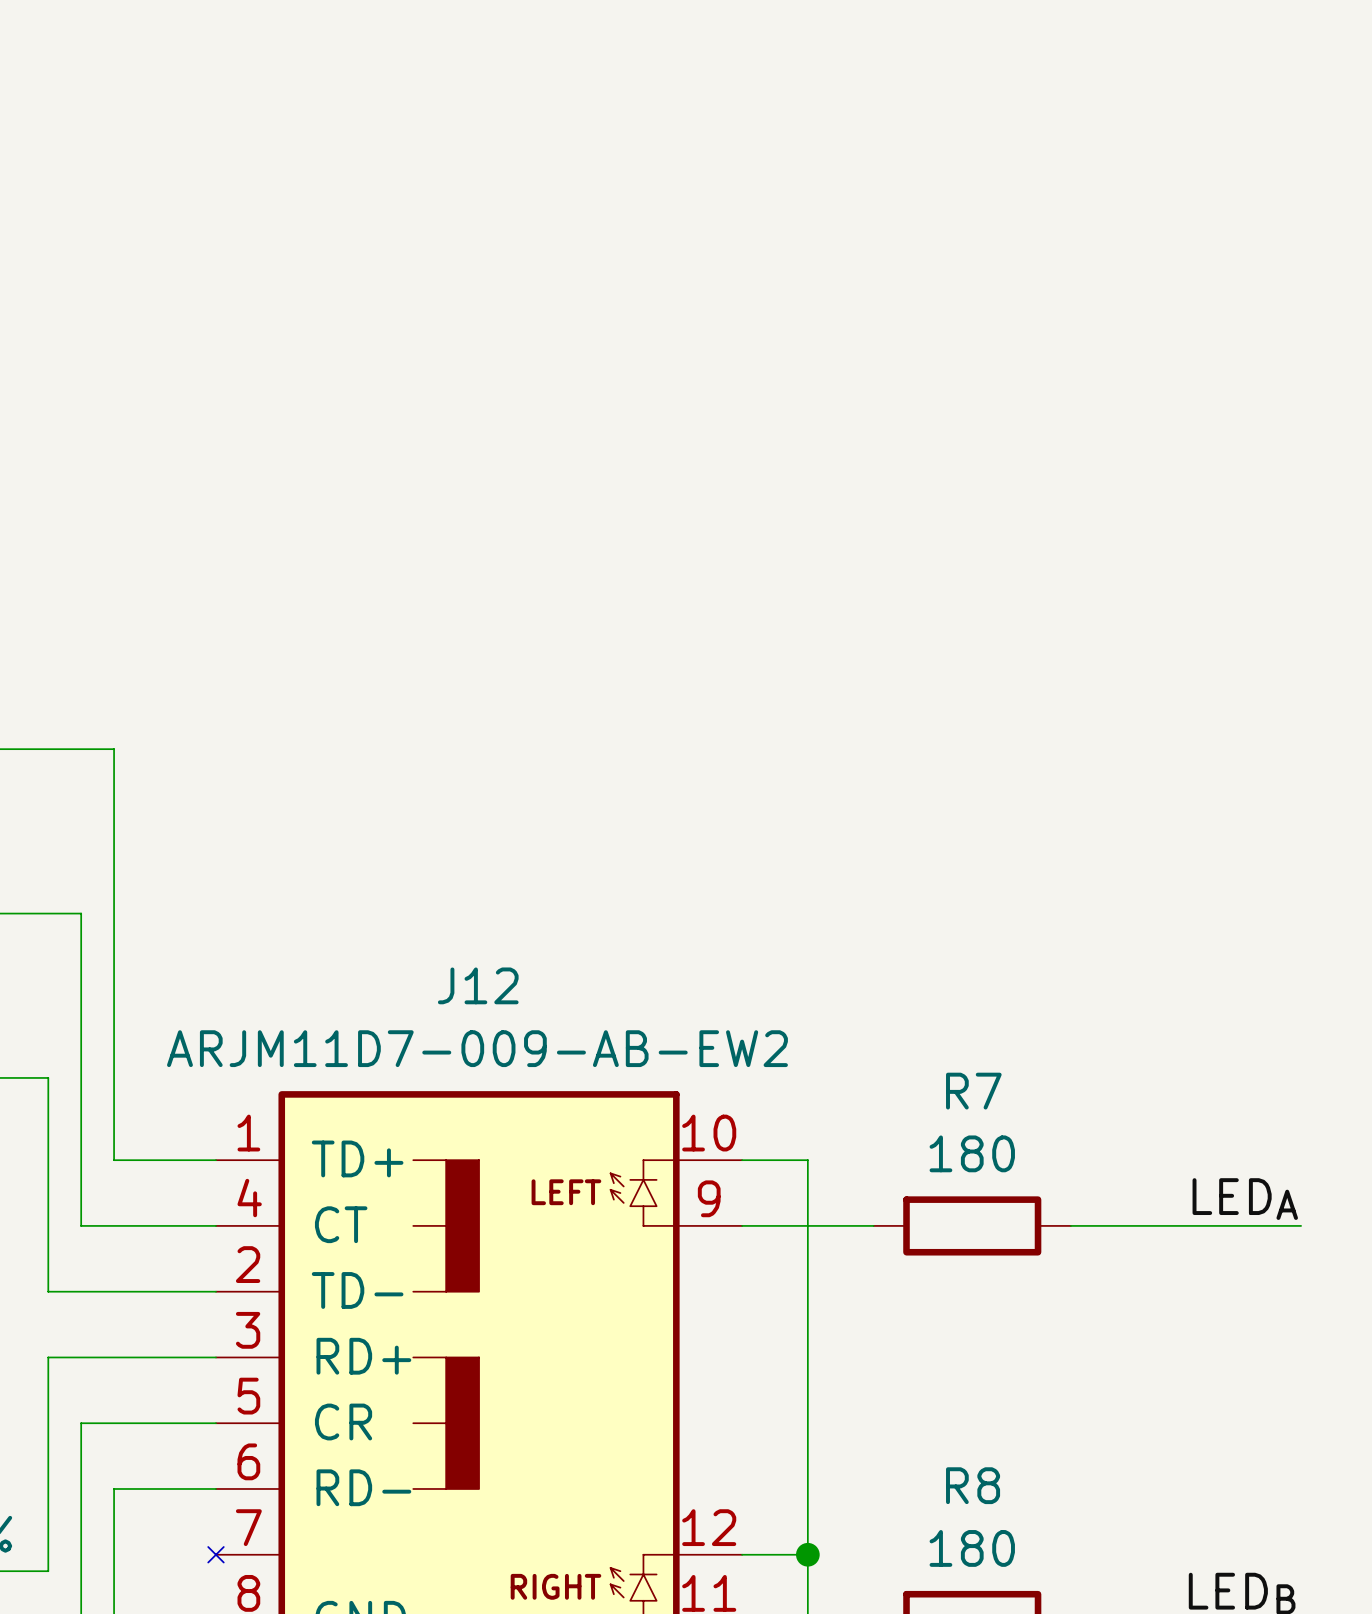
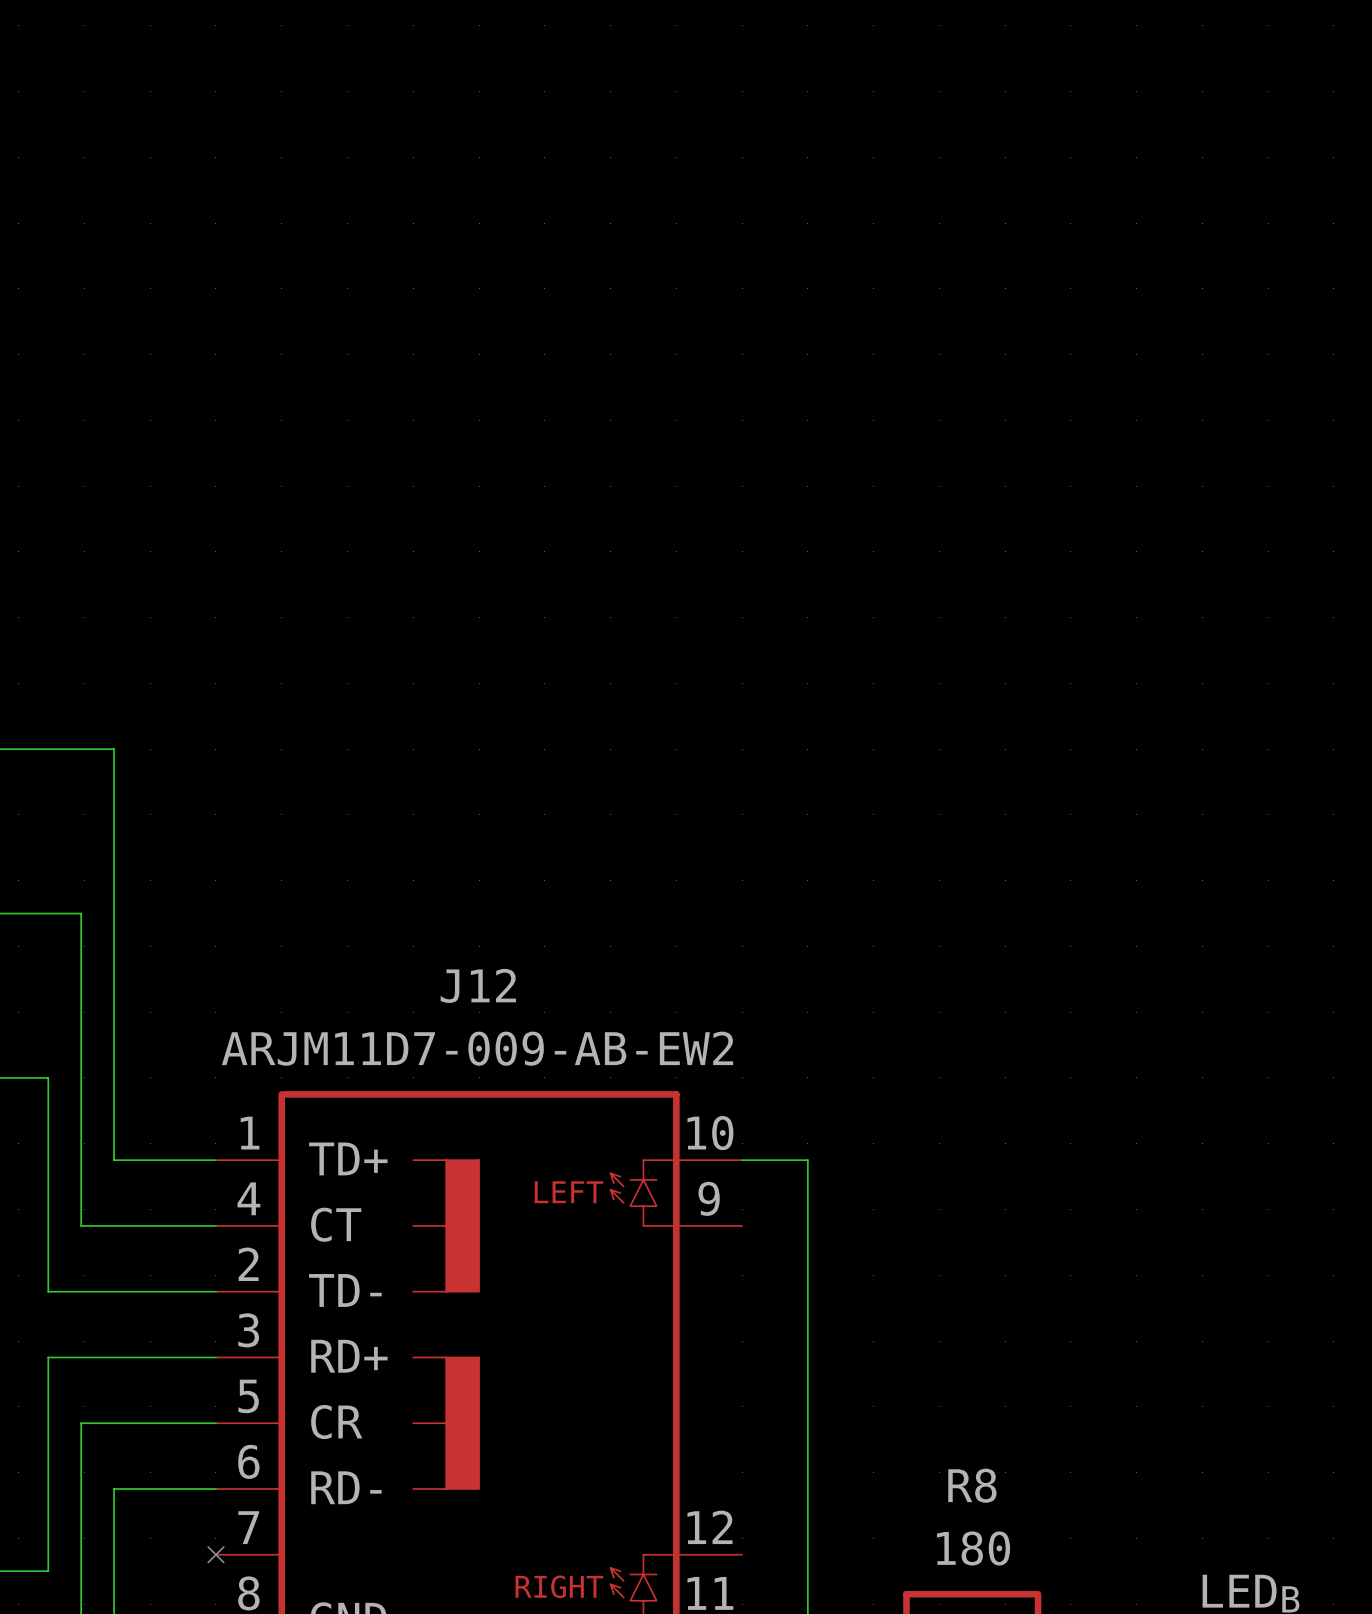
label: LEDA (1245, 1199) -> none
wire: (742, 1225) (873, 1225) -> none
R7: 180 (972, 1225) -> none
wire: (1070, 1225) (1301, 1225) -> none
wire: (742, 1554) (807, 1554) -> none
junction: (807, 1554) -> none

